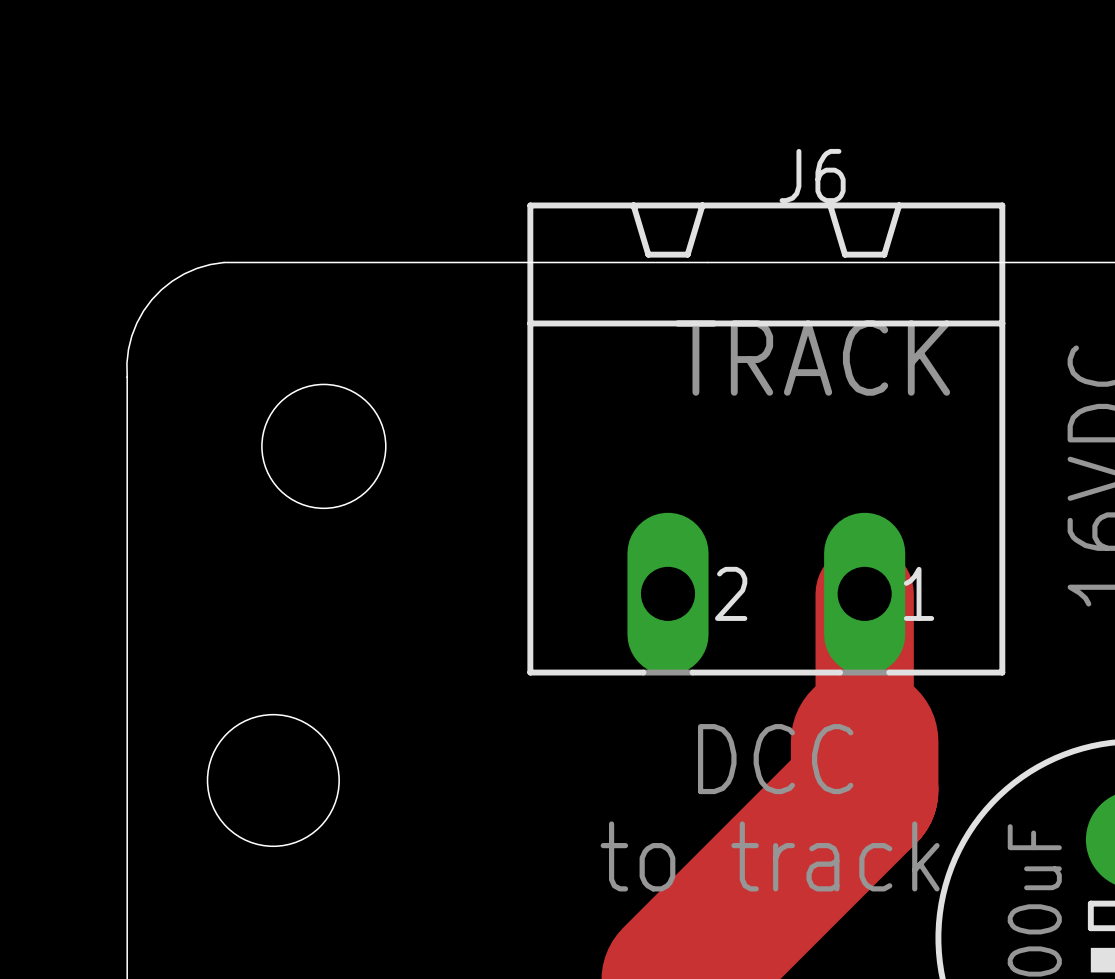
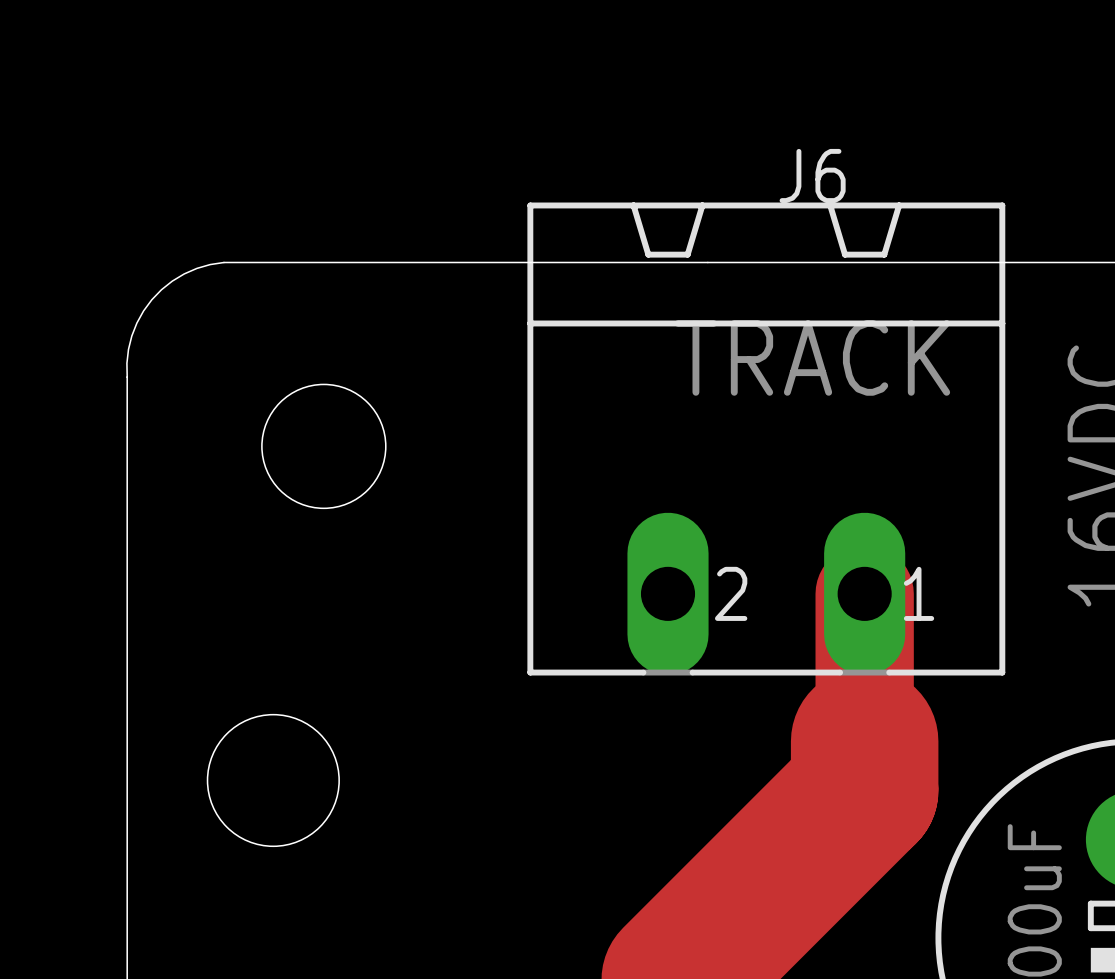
text: DCC (775, 759) -> none
text: to track (770, 856) -> none

